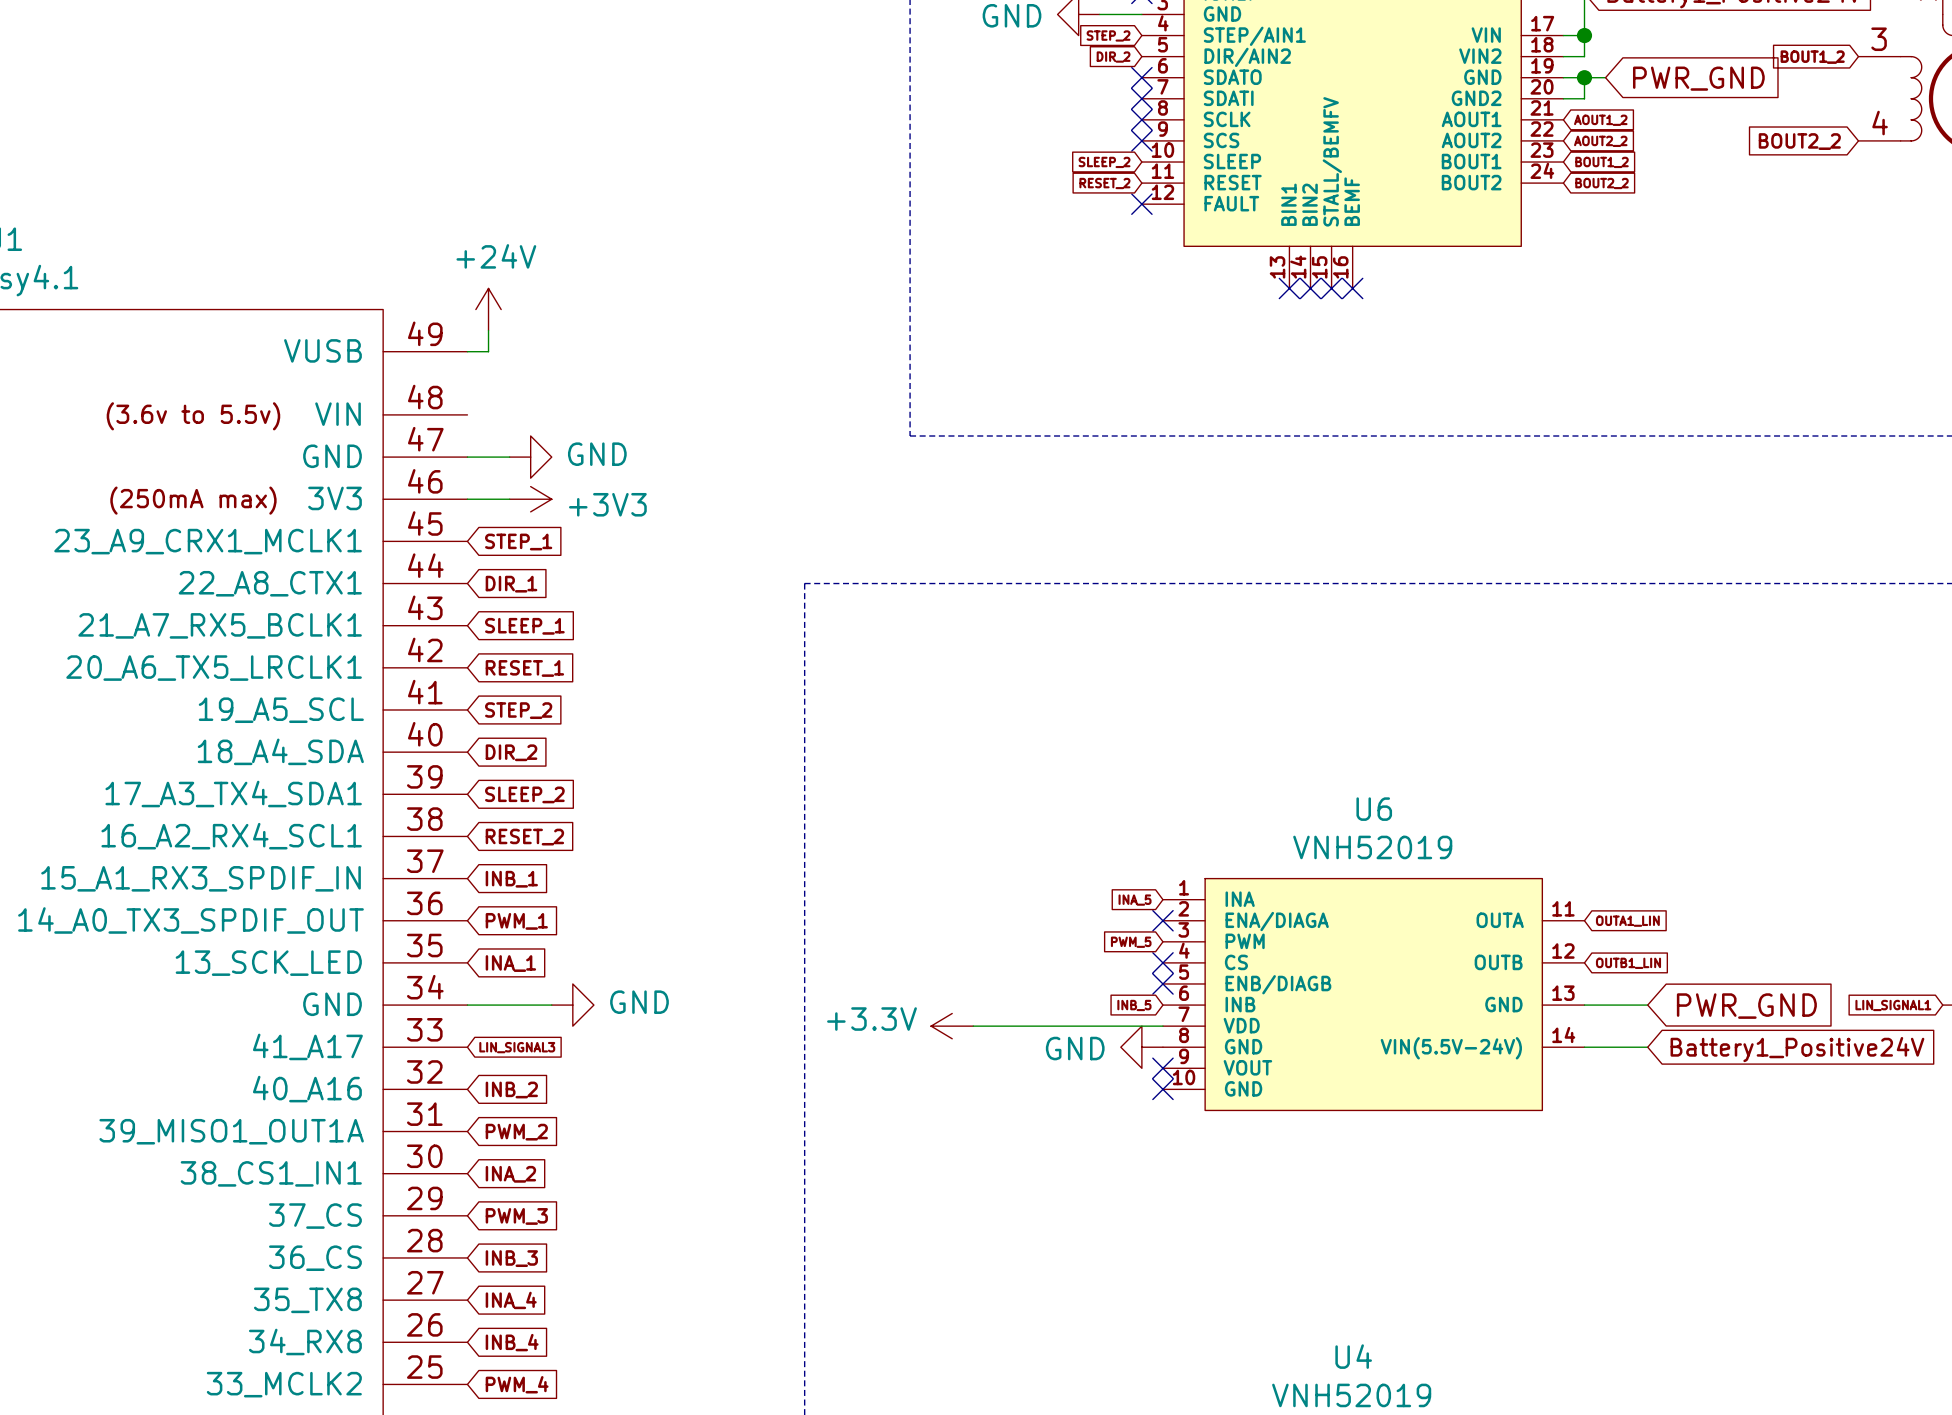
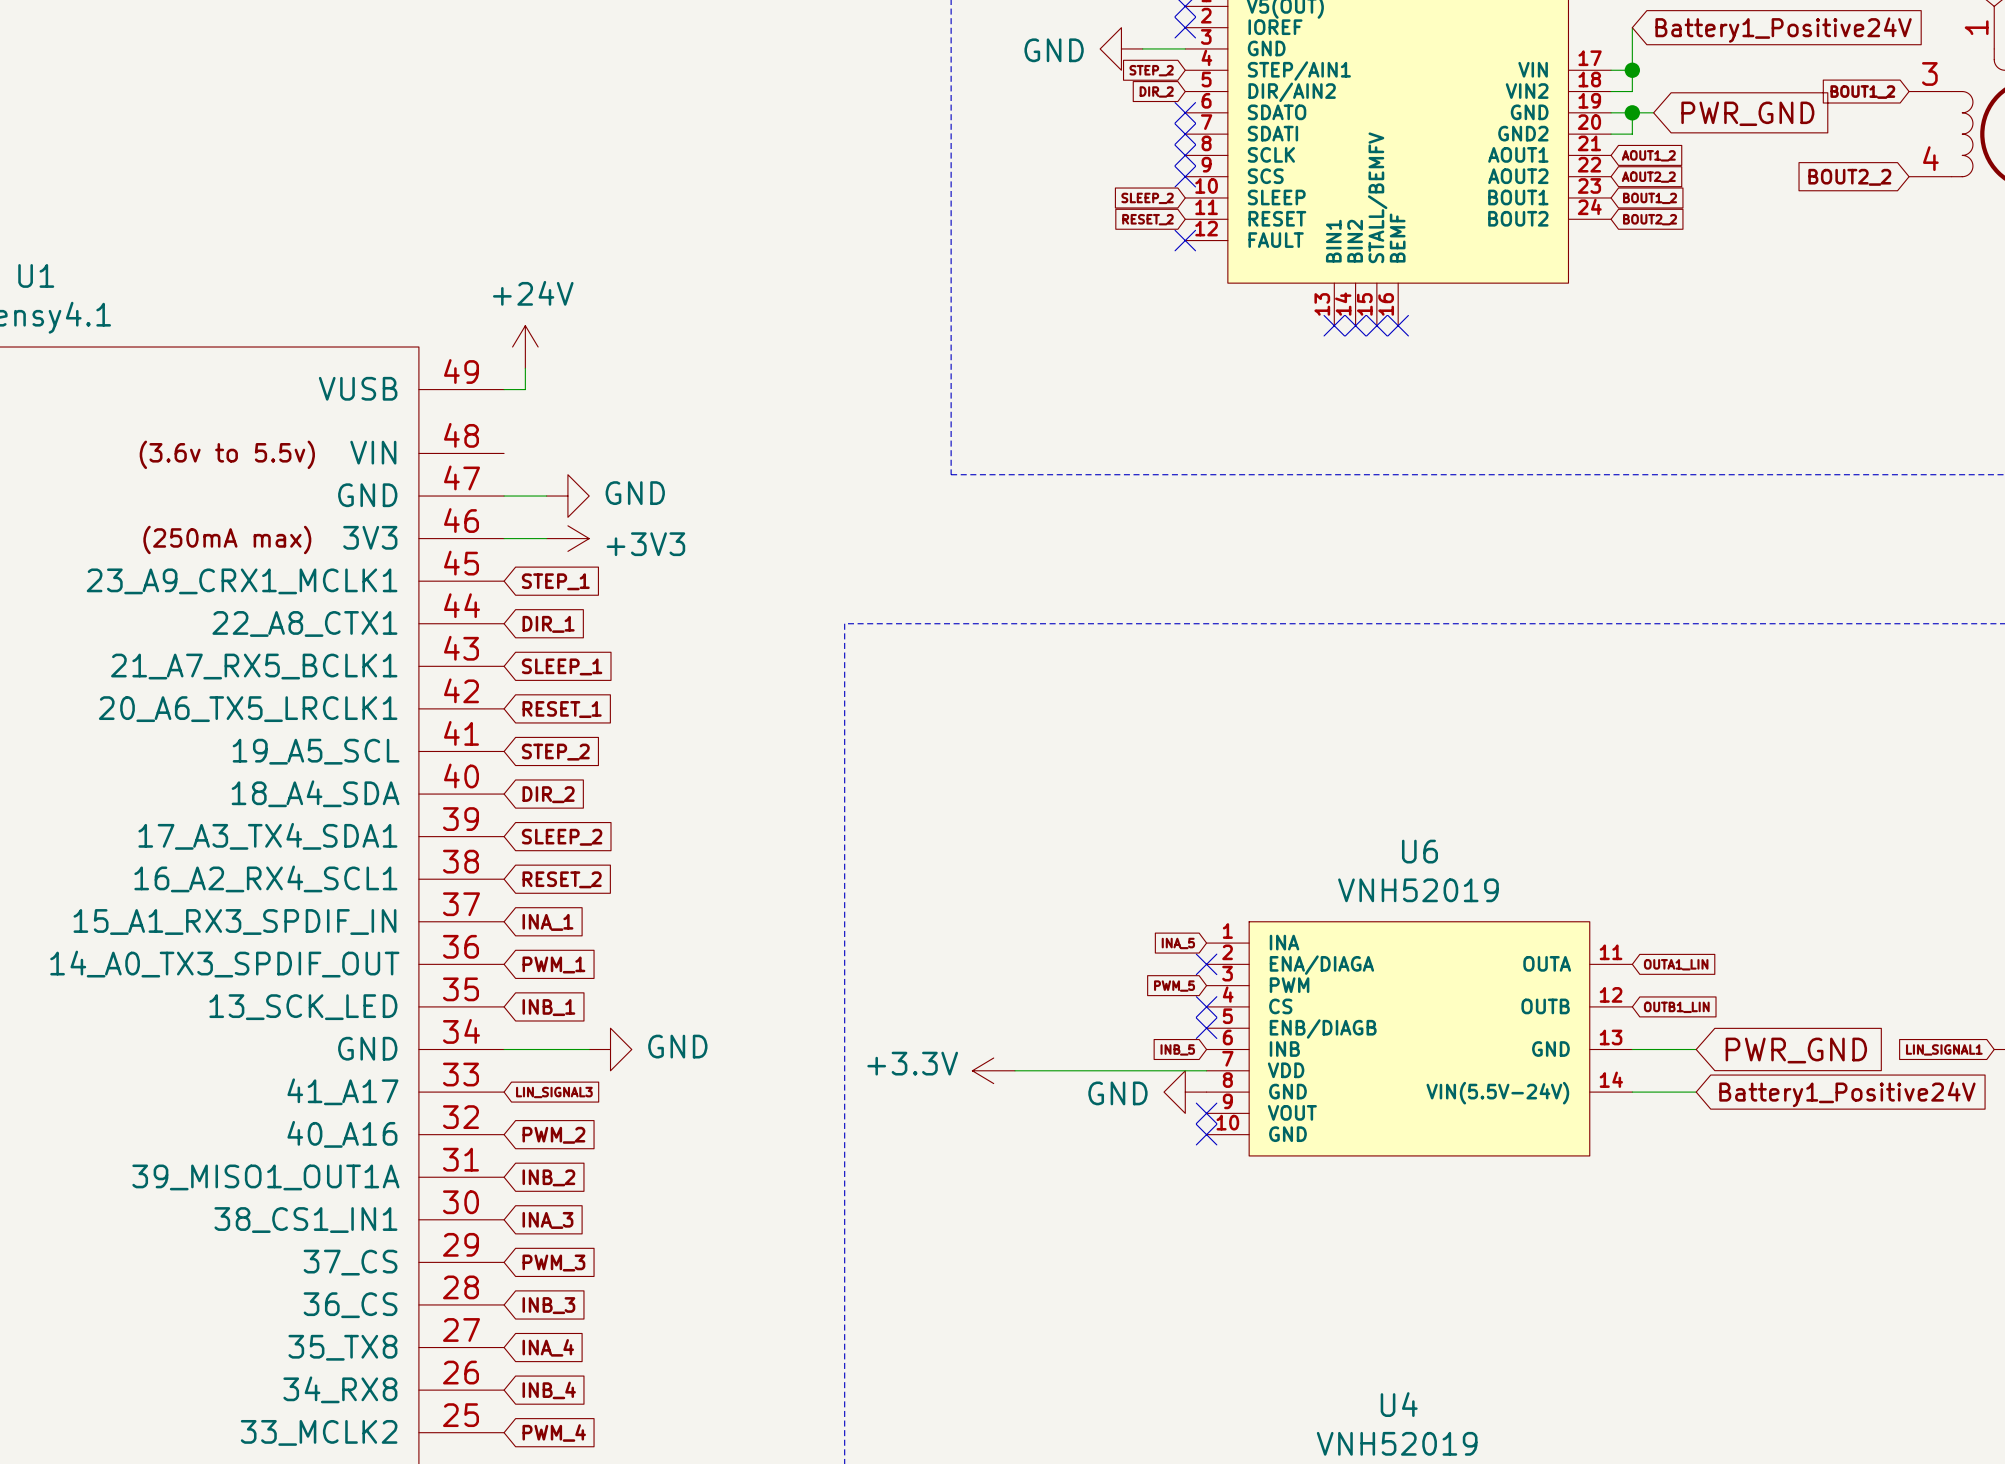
global label: INB_1 (511, 879) -> INA_1 (547, 922)
global label: INA_1 (510, 963) -> INB_1 (548, 1007)
global label: INB_2 (511, 1089) -> PWM_2 (553, 1135)
global label: PWM_2 (516, 1132) -> INB_2 (548, 1177)
global label: INA_2 (510, 1174) -> INA_3 (547, 1220)

